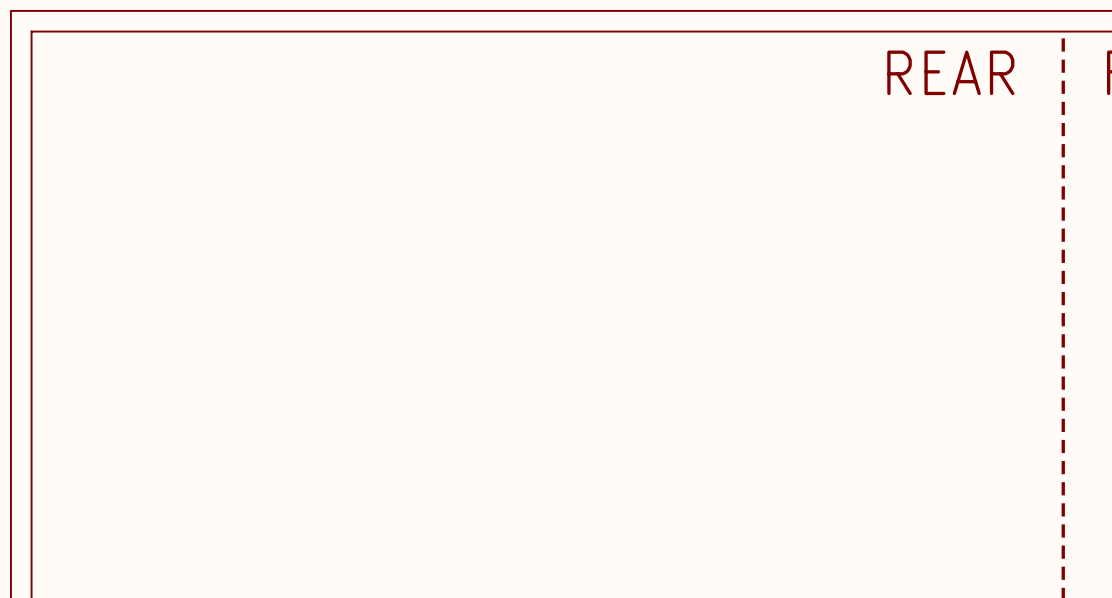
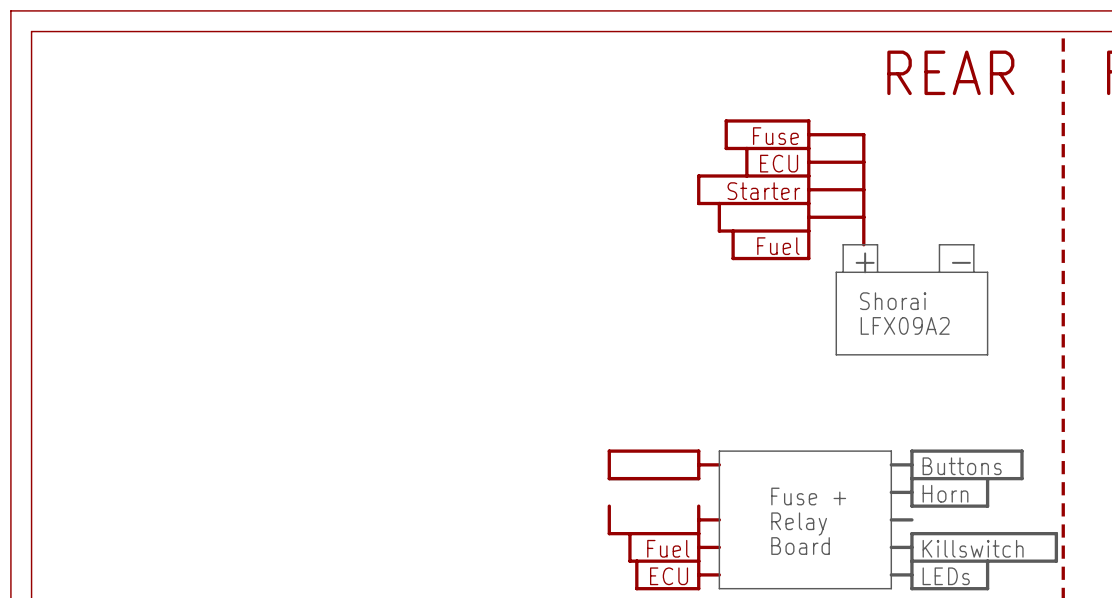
line: none -> (808, 134) (863, 134) (863, 244)
text: none -> Fuse (775, 136)
line: none -> (746, 148) (746, 175)
line: none -> (808, 148) (726, 148) (726, 120) (808, 120) (808, 258) (733, 258) (733, 231)
line: none -> (808, 162) (863, 162)
text: none -> ECU (779, 163)
line: none -> (808, 175) (698, 175) (698, 203) (808, 203)
line: none -> (808, 189) (863, 189)
text: none -> Starter (763, 191)
line: none -> (719, 203) (719, 231) (808, 231)
line: none -> (808, 217) (863, 217)
text: none -> Fuel (778, 246)
text: none -> + (865, 262)
text: none -> - (961, 262)
bus: none -> (836, 272) (987, 272) (987, 354) (836, 354) (836, 272)
bus: none -> (843, 272) (843, 244) (877, 244) (877, 272)
bus: none -> (939, 272) (939, 244) (973, 244) (973, 272)
text: none -> Shorai (893, 301)
text: none -> LFX09A2 (905, 325)
line: none -> (609, 451) (698, 451) (698, 478) (609, 478) (609, 451)
bus: none -> (719, 451) (719, 588) (891, 588) (891, 451) (719, 451)
line: none -> (698, 464) (719, 464)
line: none -> (891, 464) (911, 464)
text: none -> Buttons (962, 466)
line: none -> (911, 478) (1021, 478) (1021, 451) (911, 451) (911, 506) (987, 506) (987, 478)
line: none -> (891, 492) (911, 492)
text: none -> Horn (945, 493)
text: none -> Fuse + (808, 496)
line: none -> (609, 506) (609, 533) (698, 533)
line: none -> (698, 506) (698, 588) (636, 588) (636, 561)
line: none -> (698, 519) (719, 519)
line: none -> (891, 519) (911, 519)
text: none -> Relay (799, 524)
line: none -> (629, 533) (629, 561) (698, 561)
text: none -> Board (800, 546)
line: none -> (698, 547) (719, 547)
line: none -> (891, 547) (911, 547)
text: none -> Fuel (668, 548)
text: none -> Killswitch (973, 548)
line: none -> (911, 561) (1056, 561) (1056, 533) (911, 533) (911, 588) (987, 588) (987, 561)
line: none -> (698, 574) (719, 574)
line: none -> (891, 574) (911, 574)
text: none -> ECU (669, 576)
text: none -> LEDs (946, 576)

